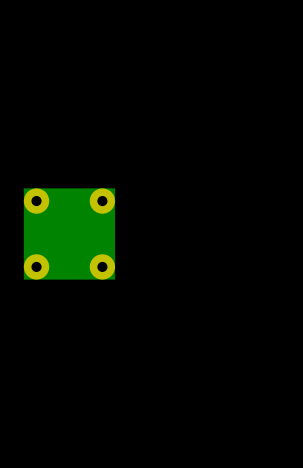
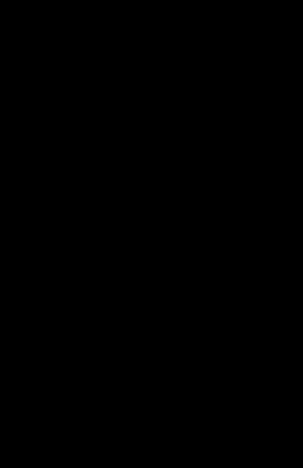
part: (69, 233) -> none

